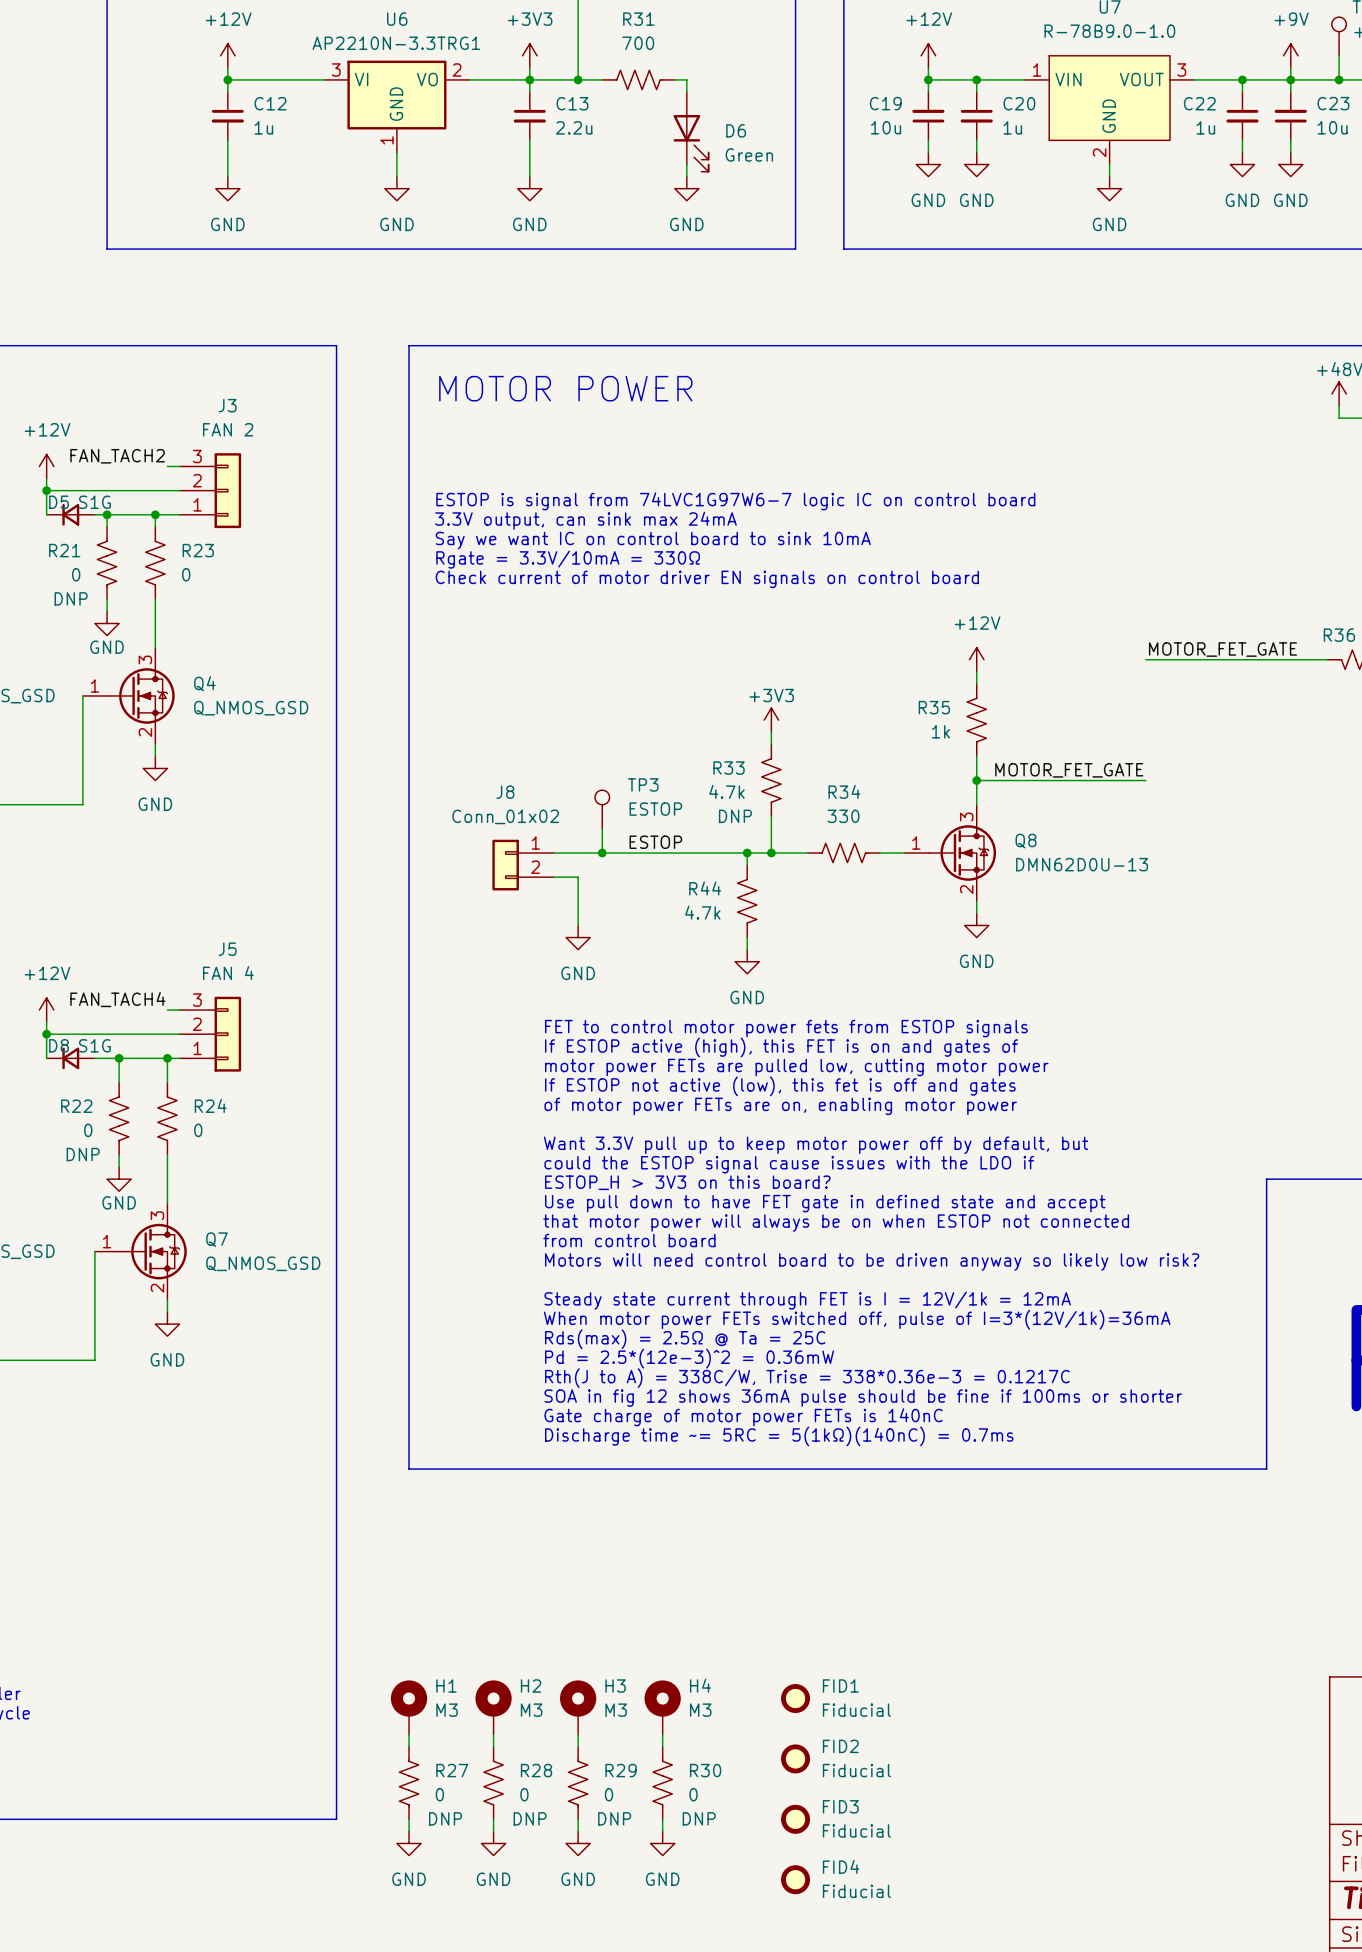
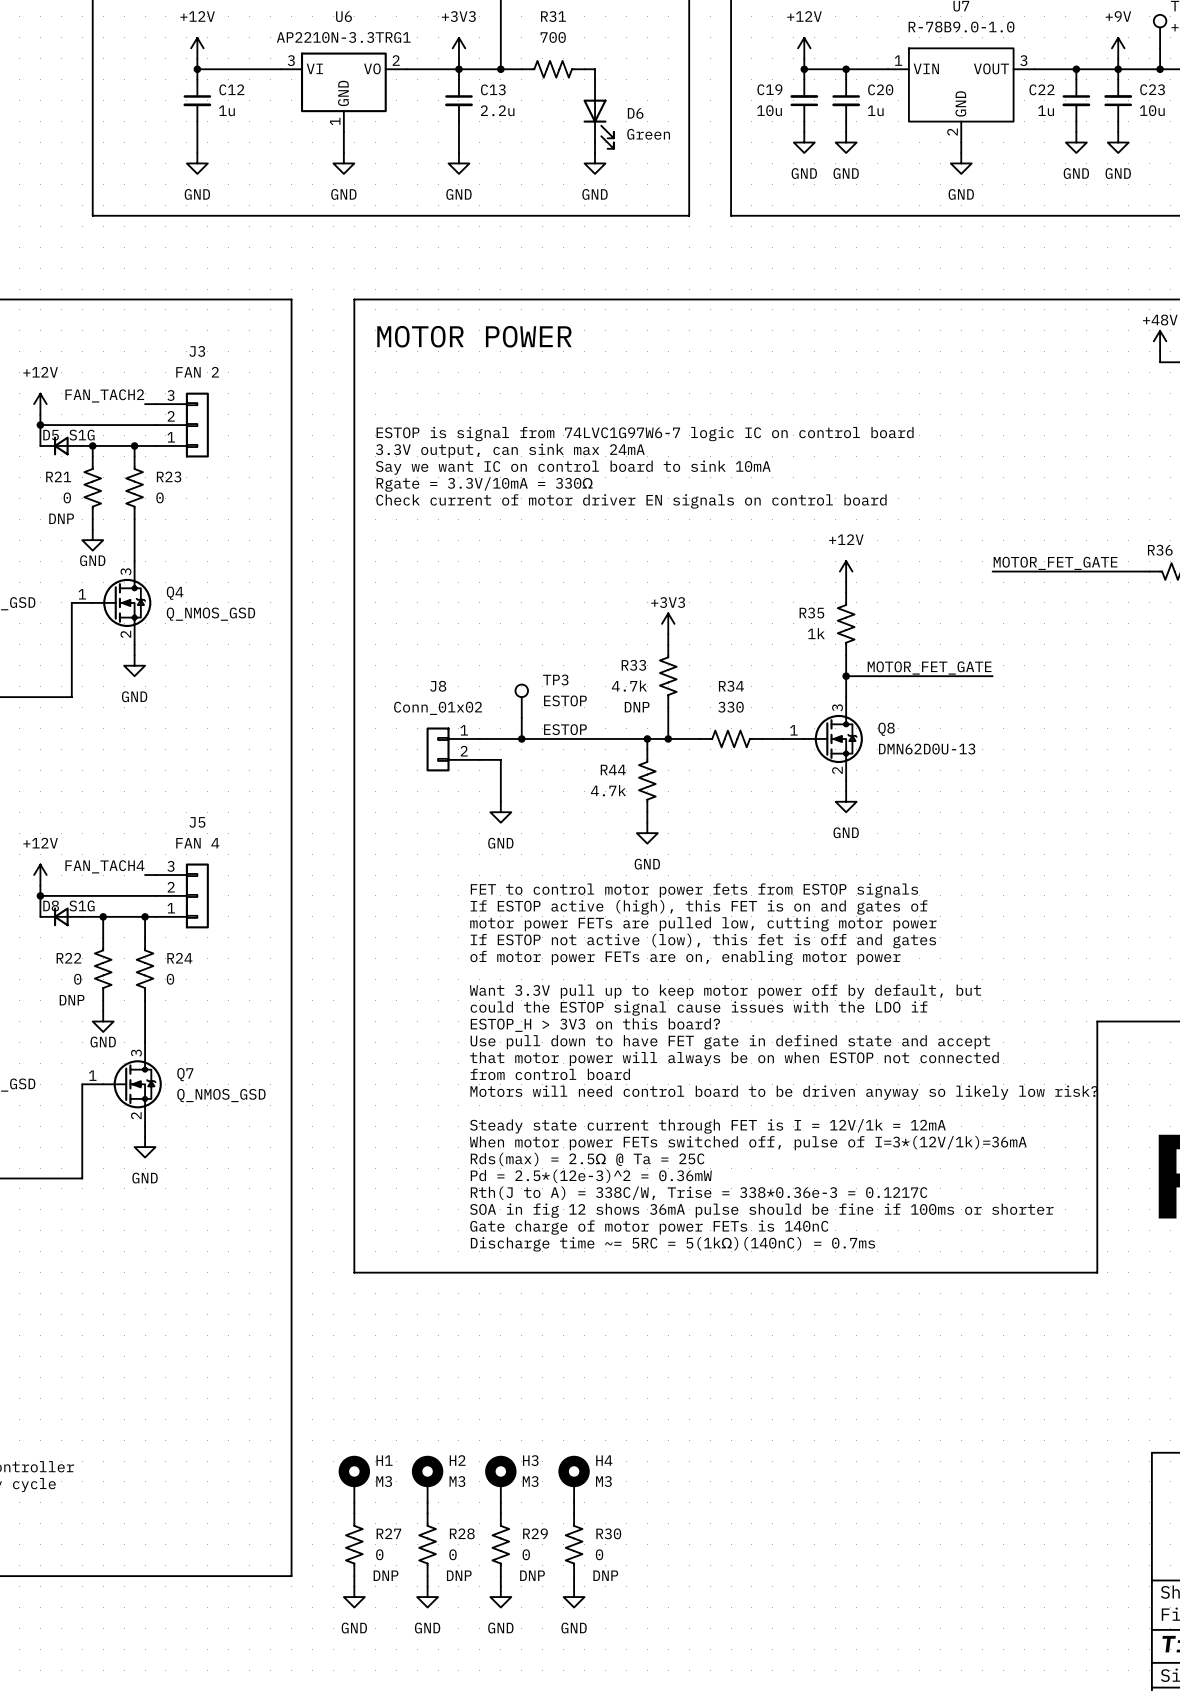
FID1: Fiducial (795, 1698) -> none
FID2: Fiducial (795, 1758) -> none
FID3: Fiducial (795, 1819) -> none
FID4: Fiducial (795, 1879) -> none

